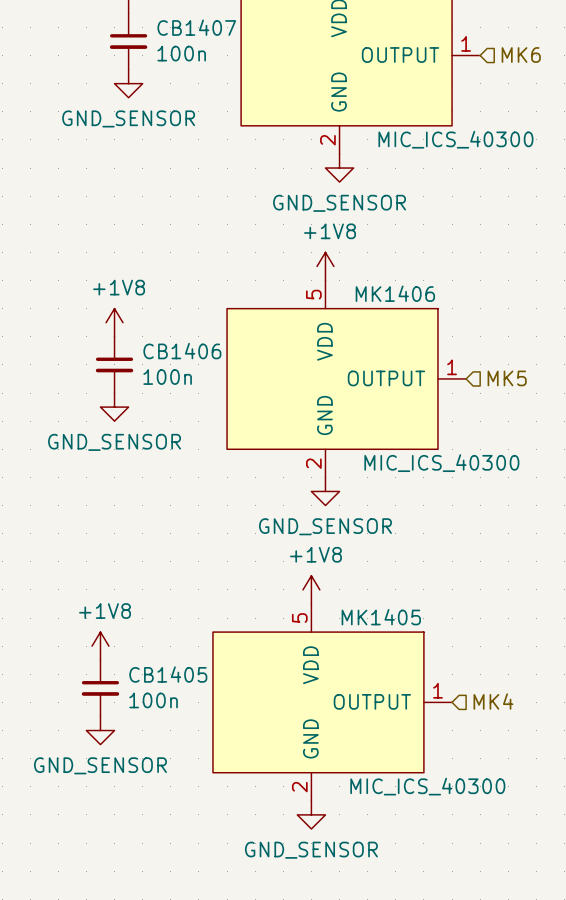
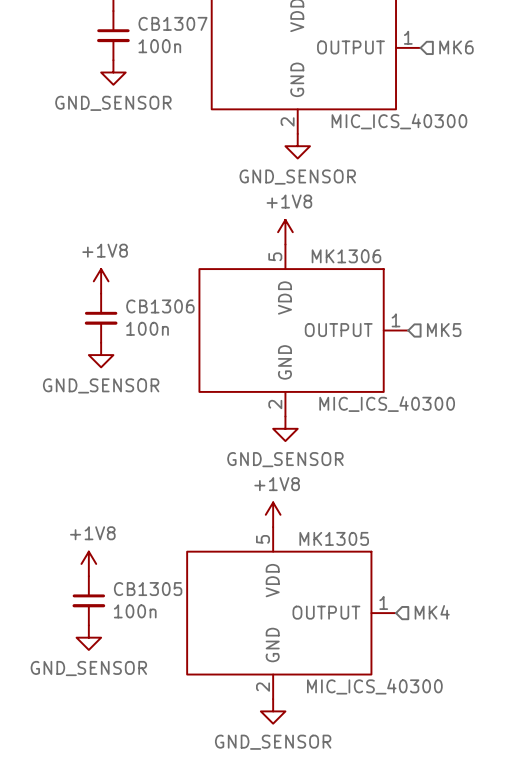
CB1407 name: CB1407 (196, 27) -> CB1307 (172, 23)
MK1406 name: MK1406 (395, 293) -> MK1306 (346, 256)
CB1406 name: CB1406 (182, 351) -> CB1306 (160, 306)
MK1405 name: MK1405 (381, 617) -> MK1305 (334, 538)
CB1405 name: CB1405 (168, 674) -> CB1305 (148, 589)

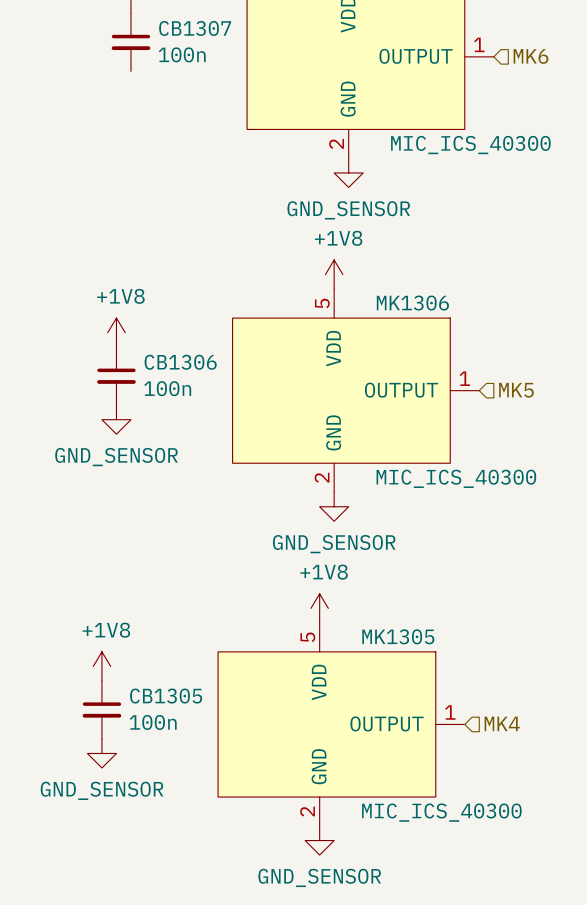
power symbol: GND_SENSOR (113, 72) -> none

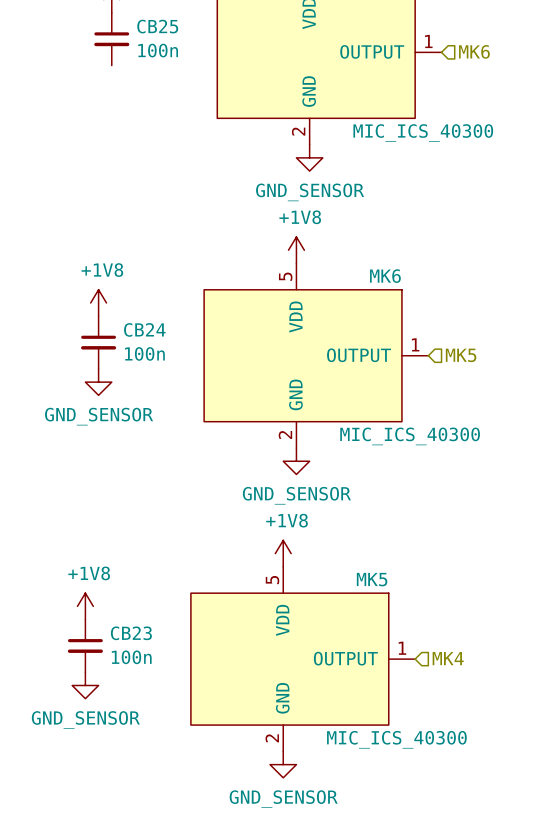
CB1307 name: CB1307 (195, 28) -> CB25 (157, 26)
MK1306 name: MK1306 (412, 303) -> MK6 (385, 276)
CB1306 name: CB1306 (180, 362) -> CB24 (144, 329)
MK1305 name: MK1305 (398, 636) -> MK5 (372, 579)
CB1305 name: CB1305 (166, 696) -> CB23 (131, 633)

